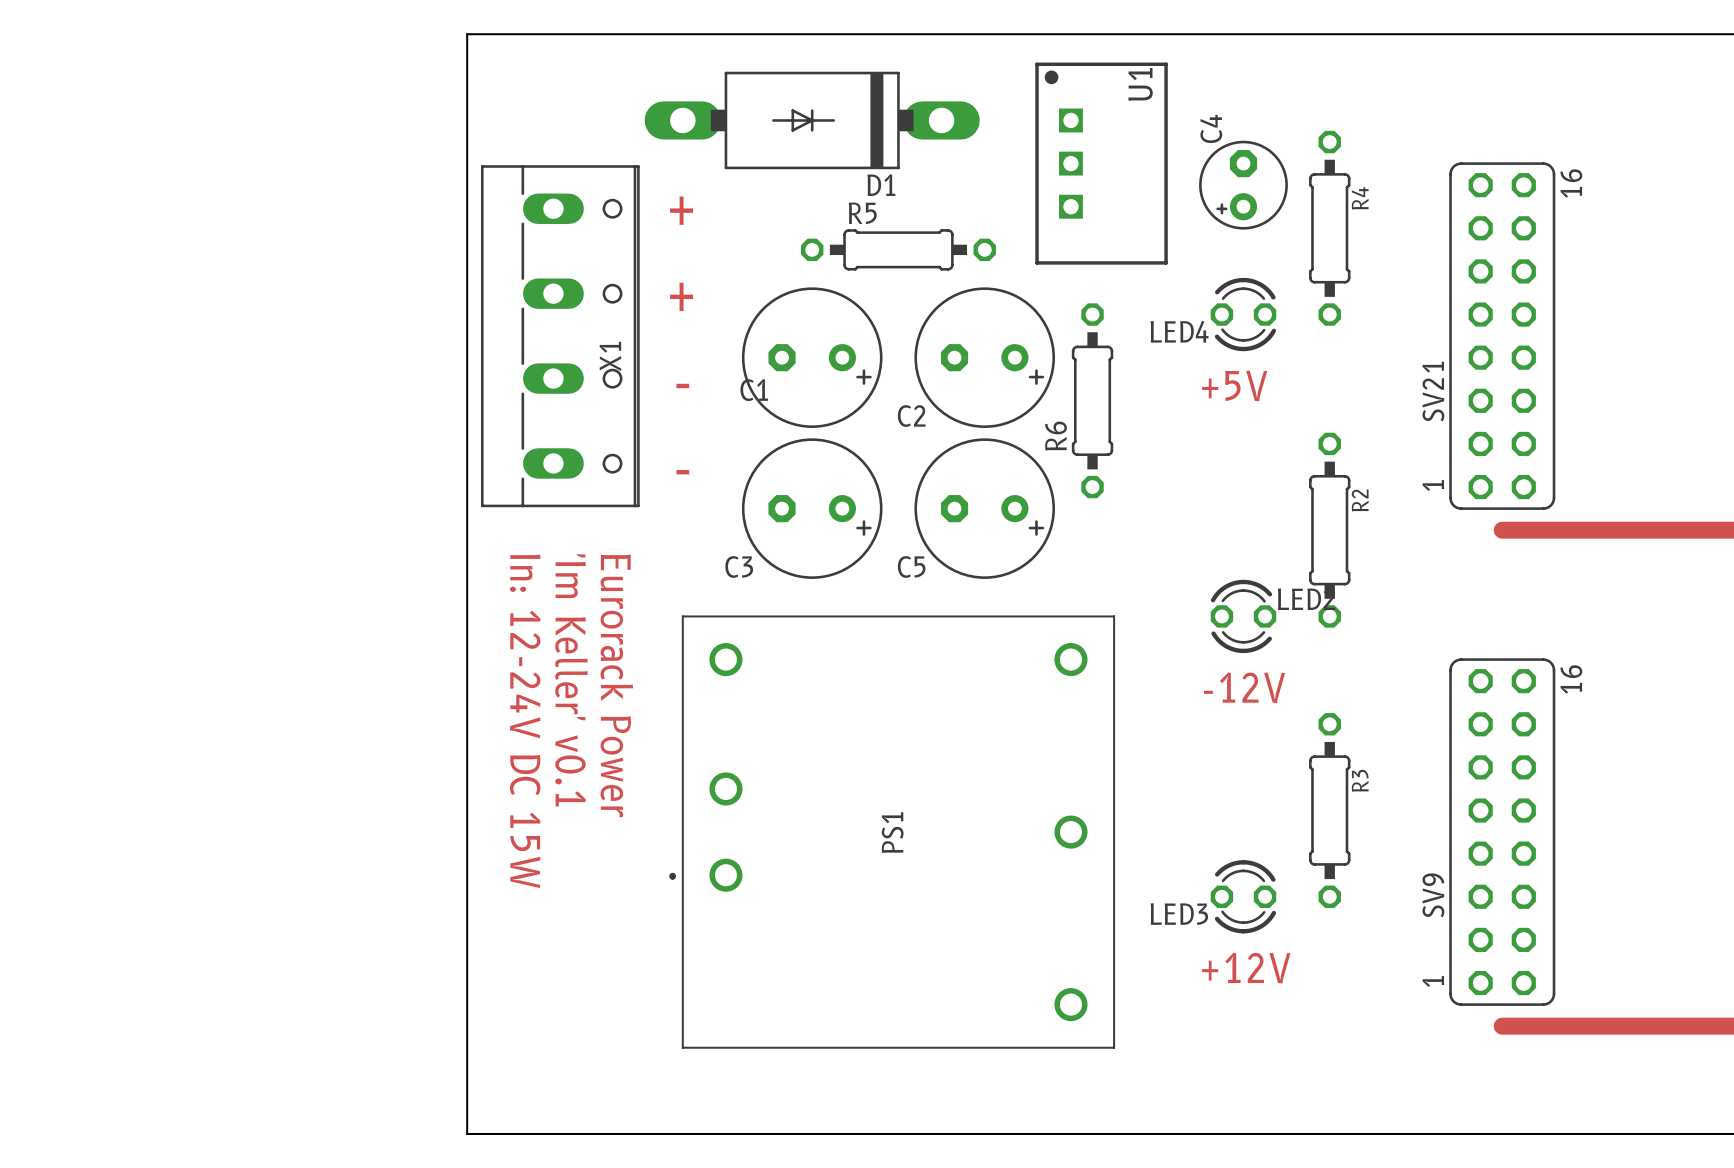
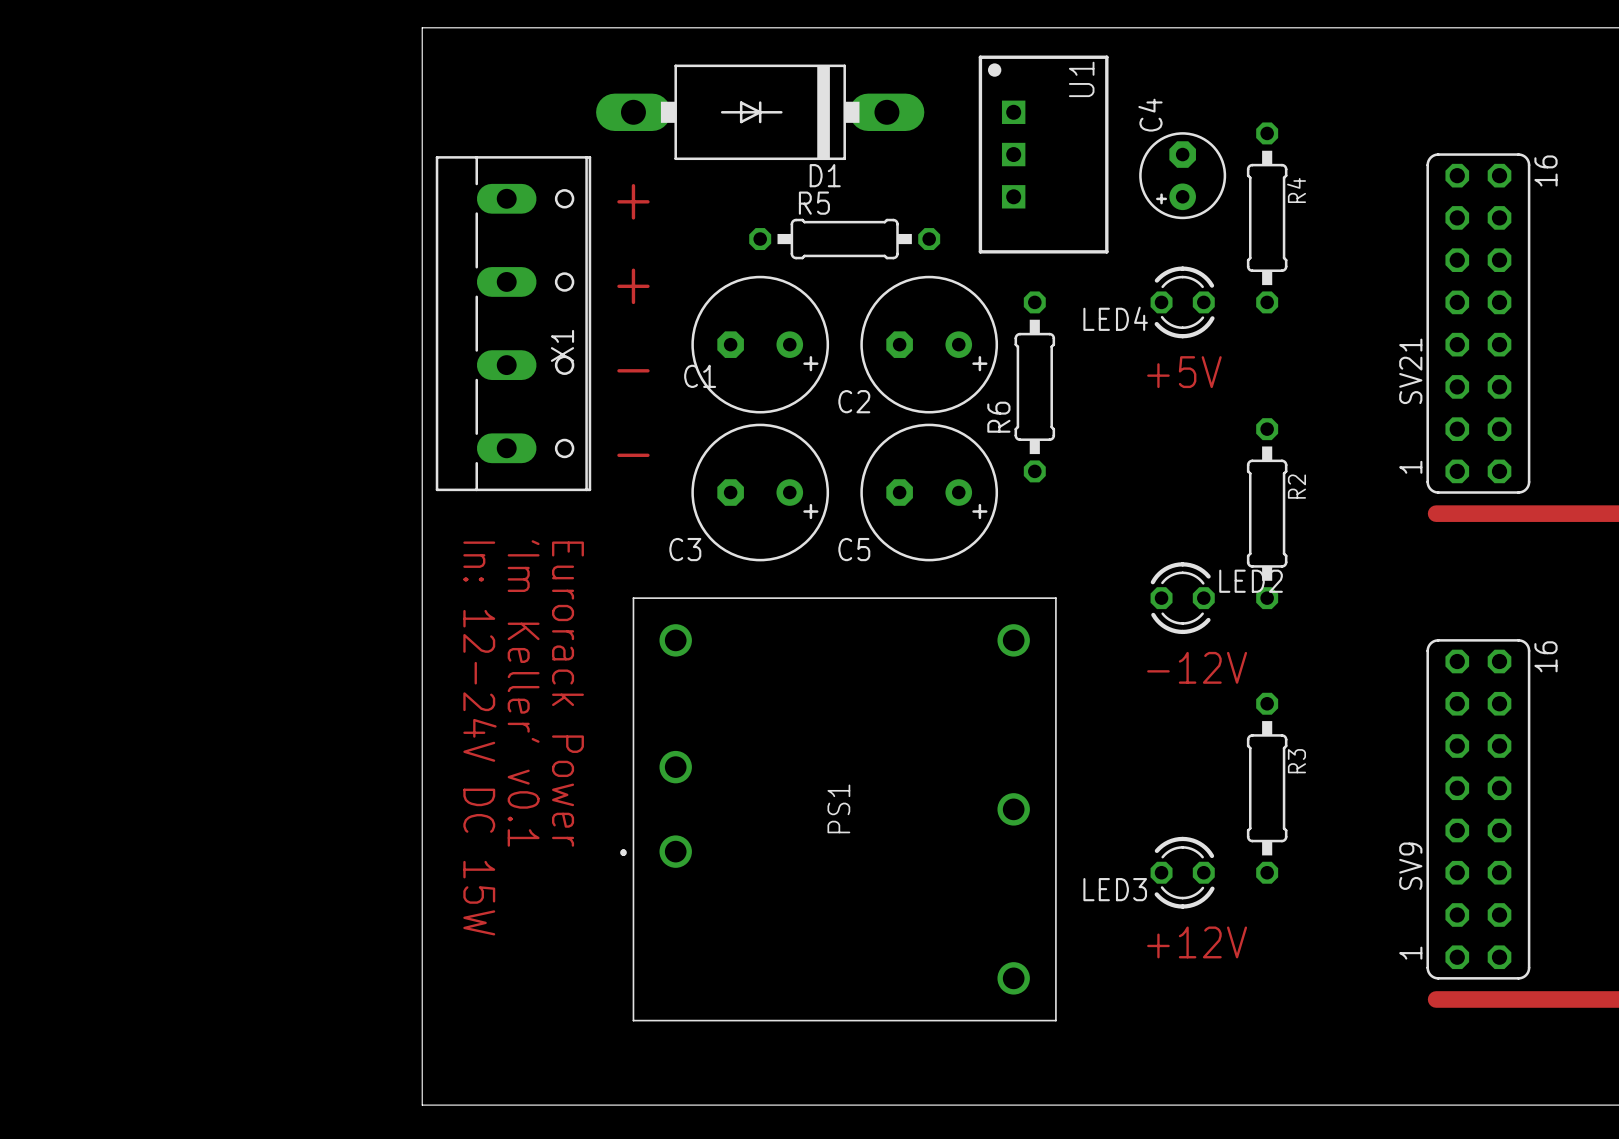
SV21 position: (1502, 336) -> (1478, 323)
SV9 position: (1502, 832) -> (1478, 809)

